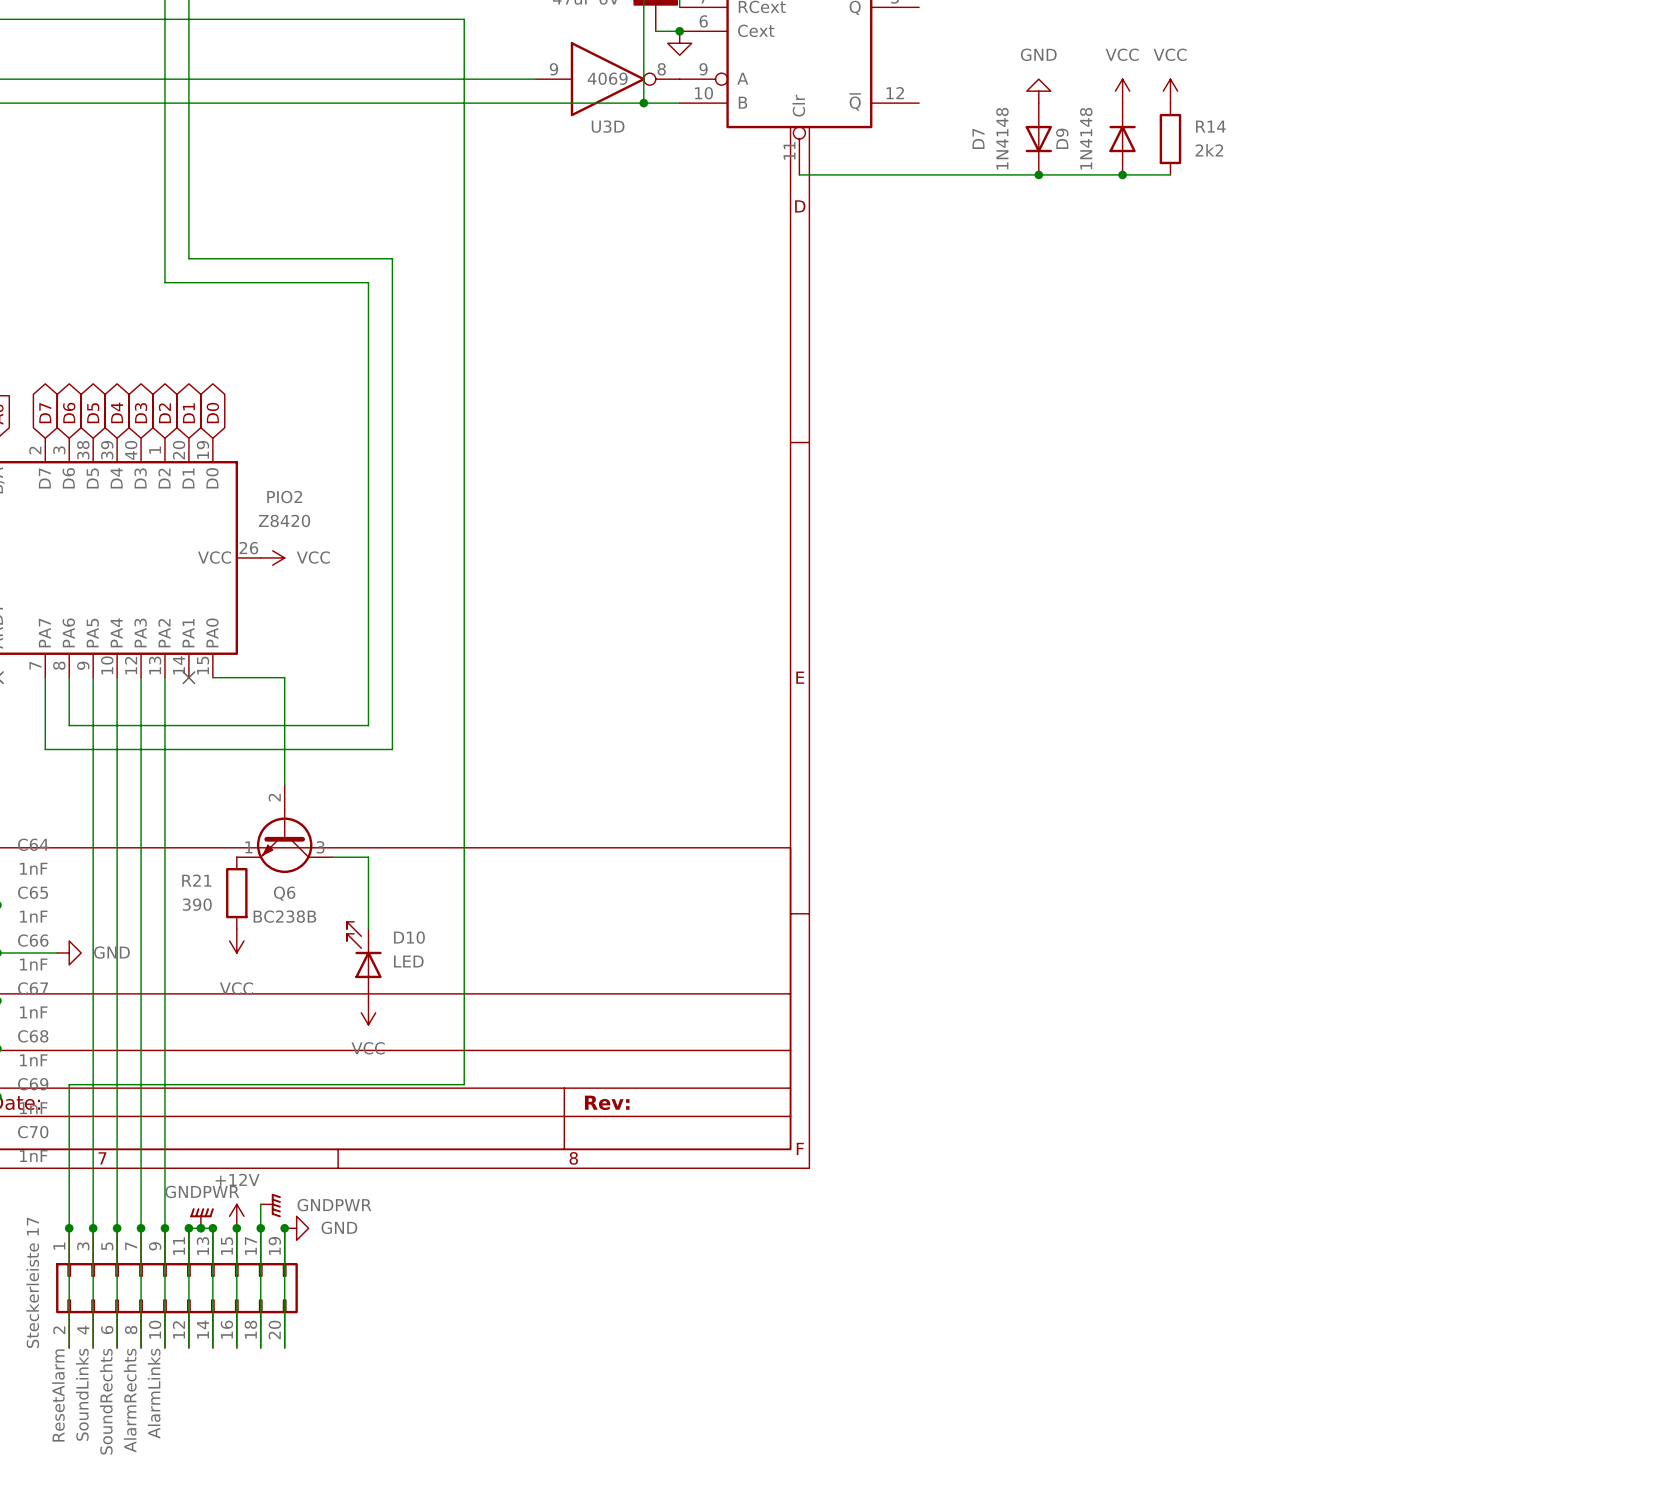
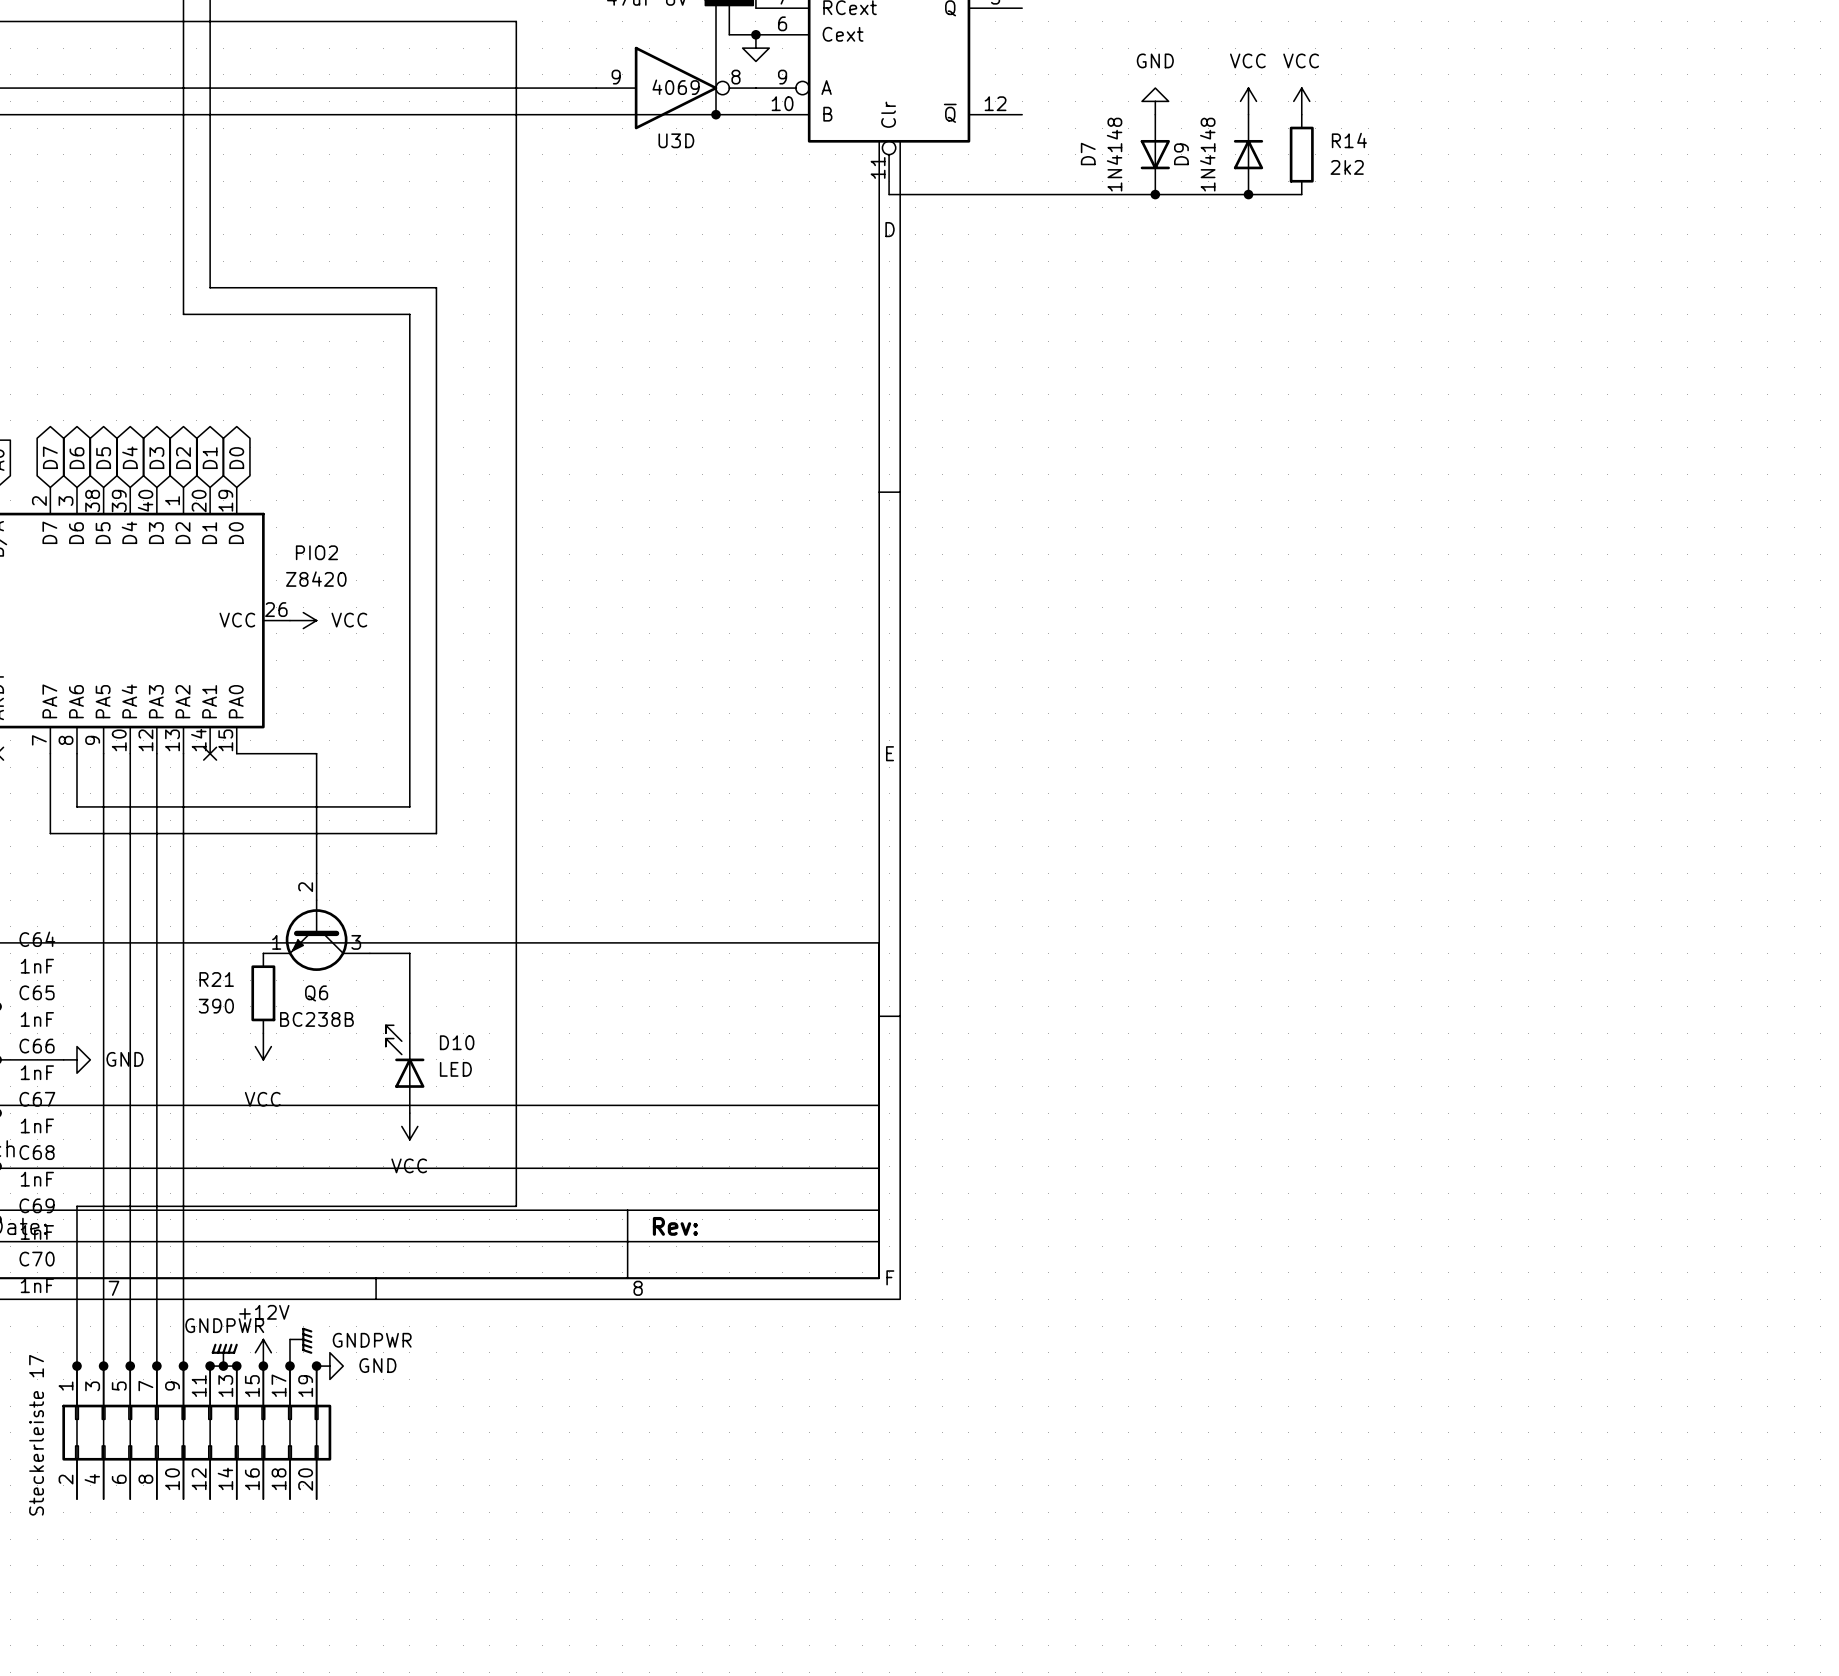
label: AlarmLinks (154, 1393) -> none
label: SoundLinks (82, 1394) -> none
label: ResetAlarm (58, 1395) -> none
label: AlarmRechts (130, 1400) -> none
label: SoundRechts (106, 1401) -> none

